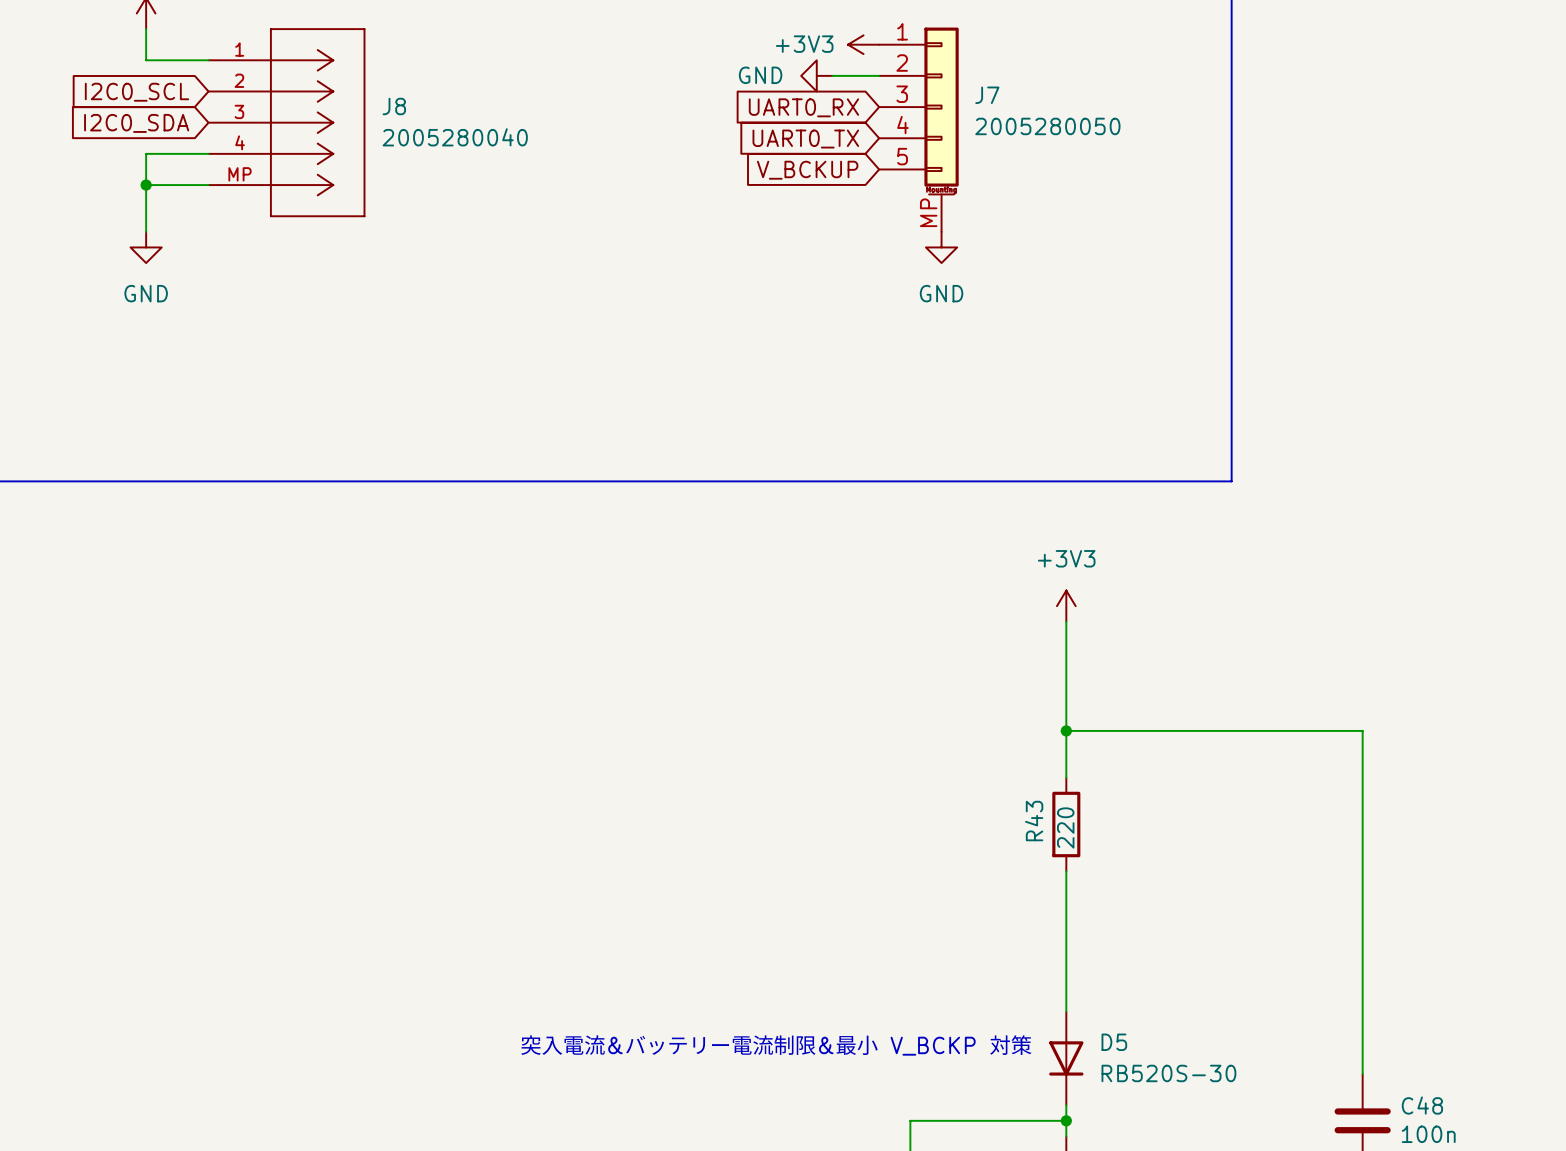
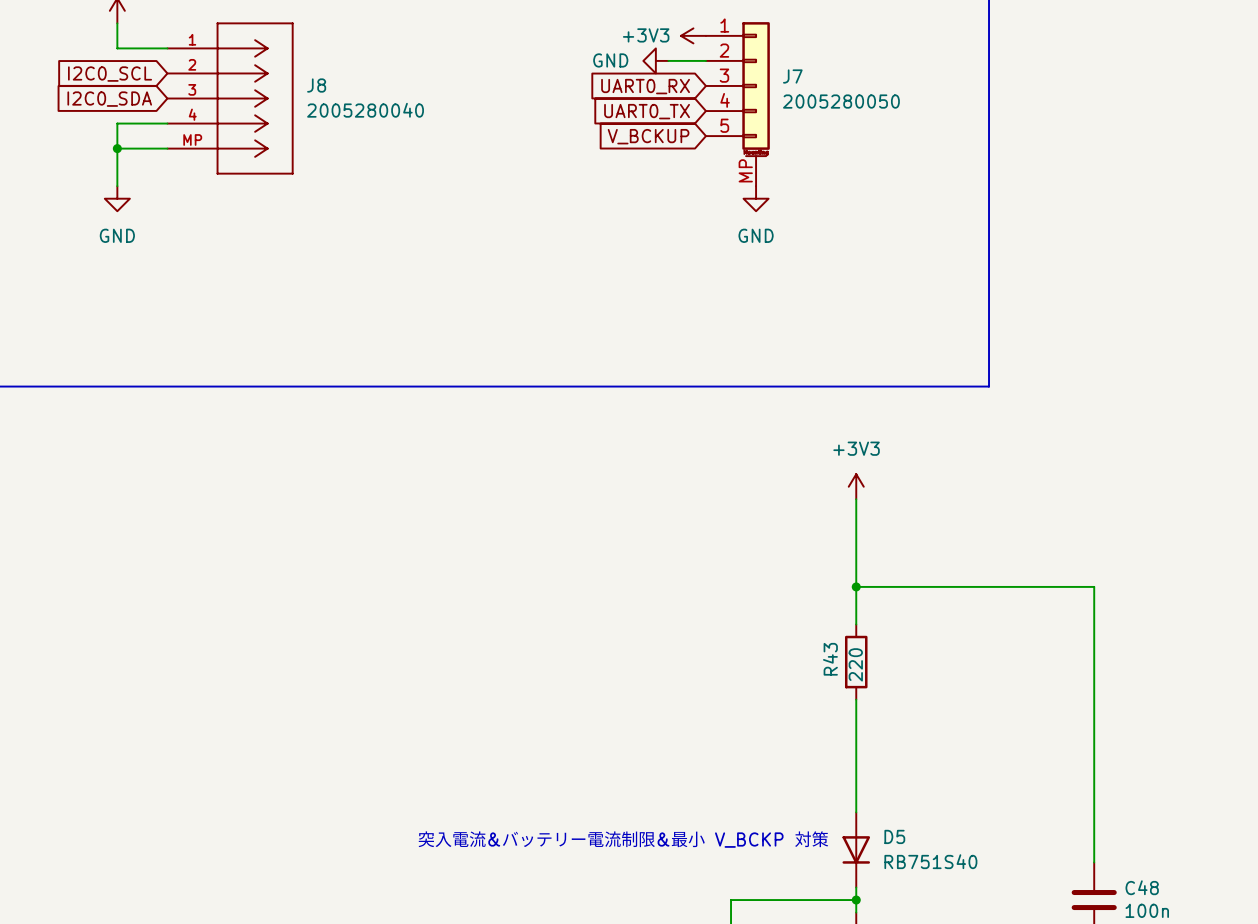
D5 value: RB520S-30 (1168, 1073) -> RB751S40 (930, 861)

